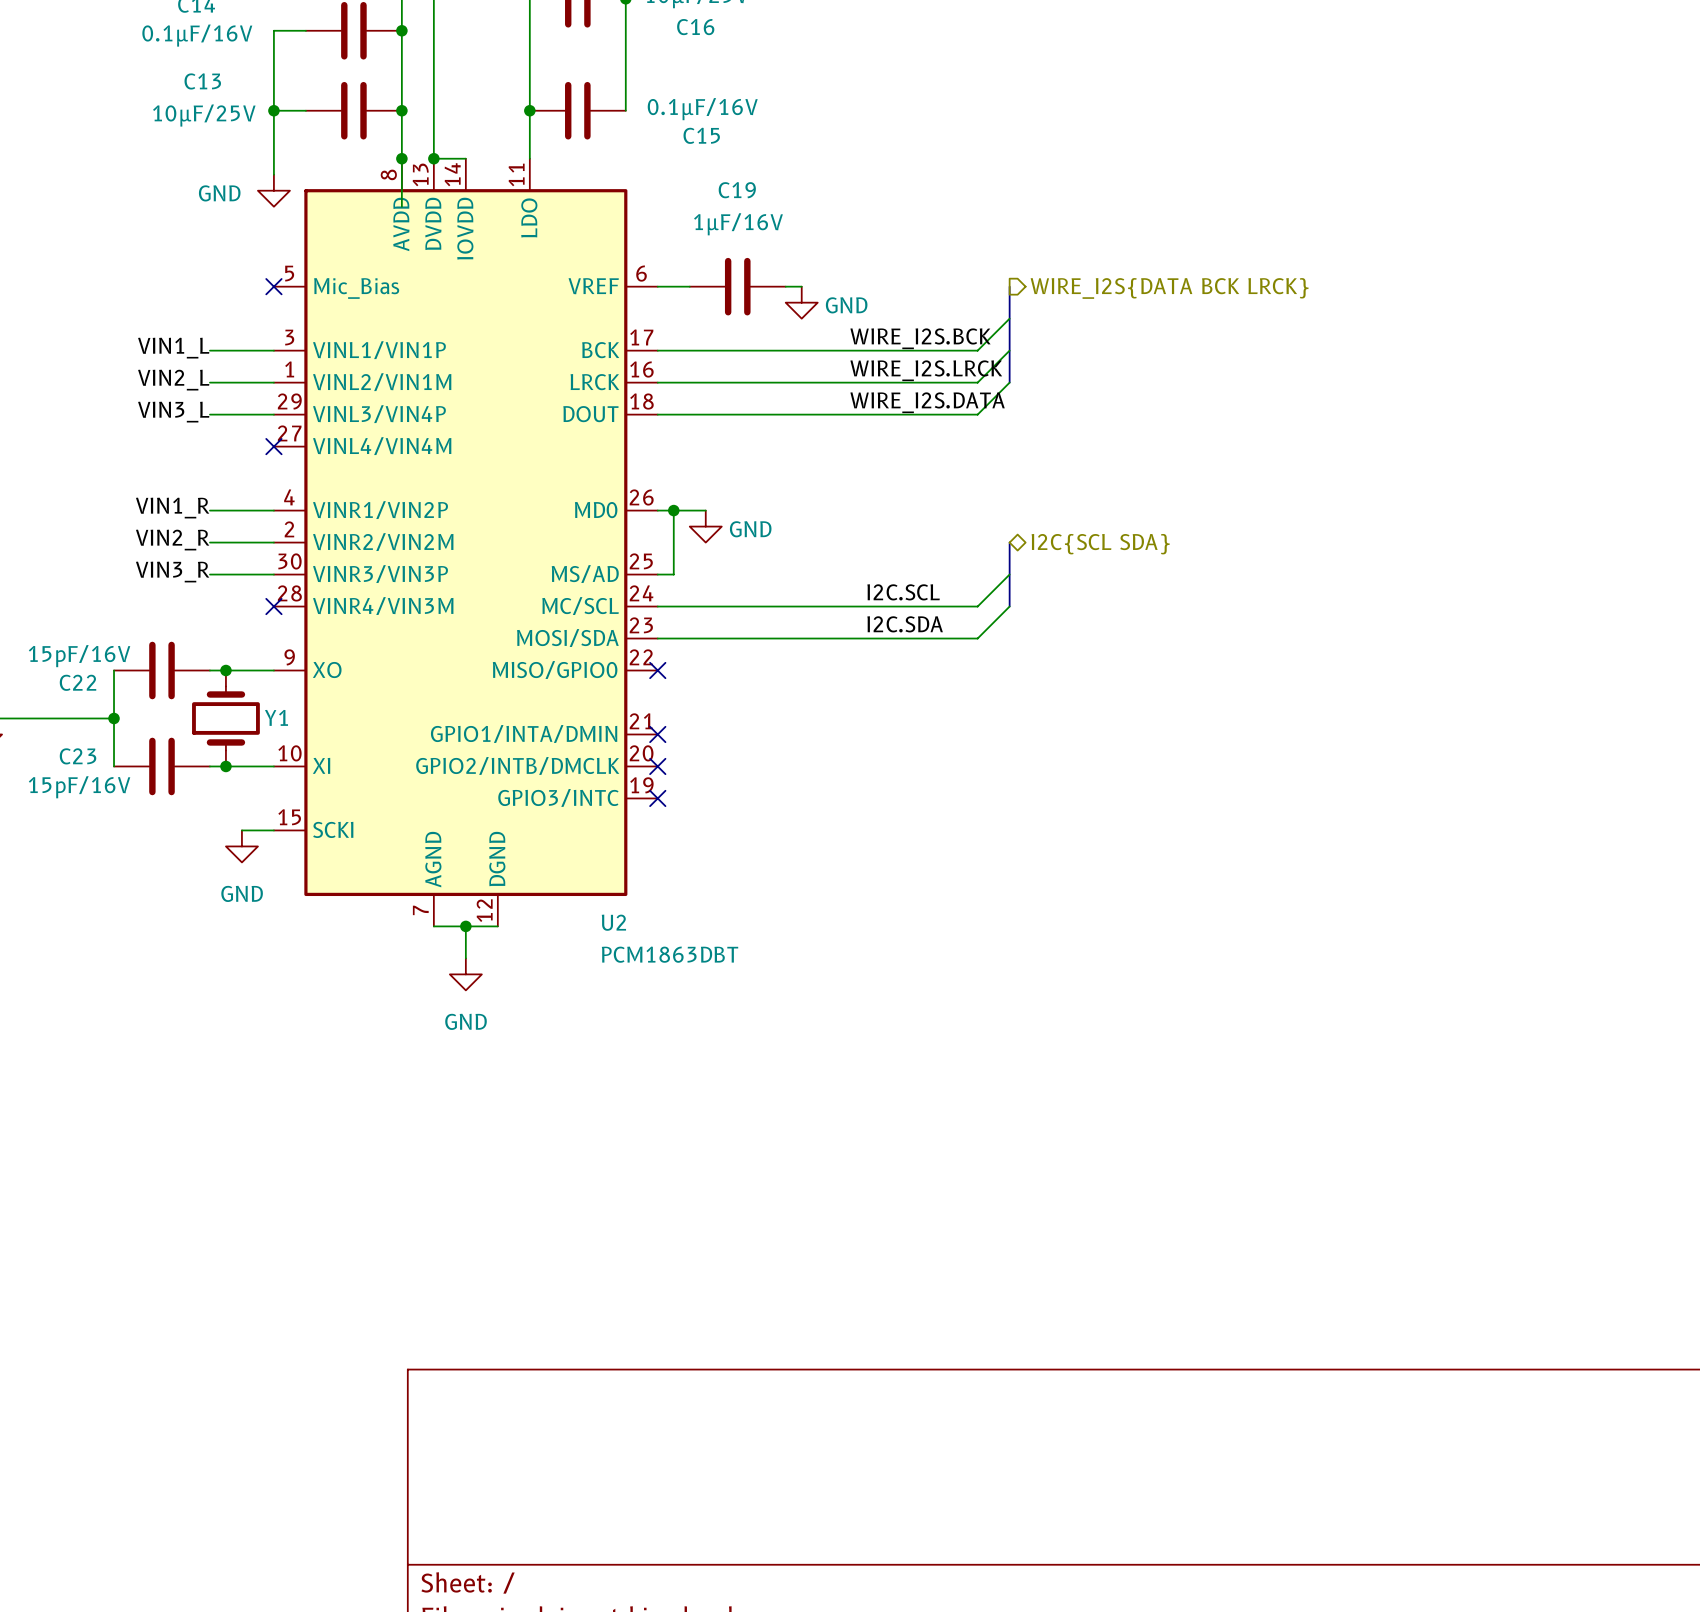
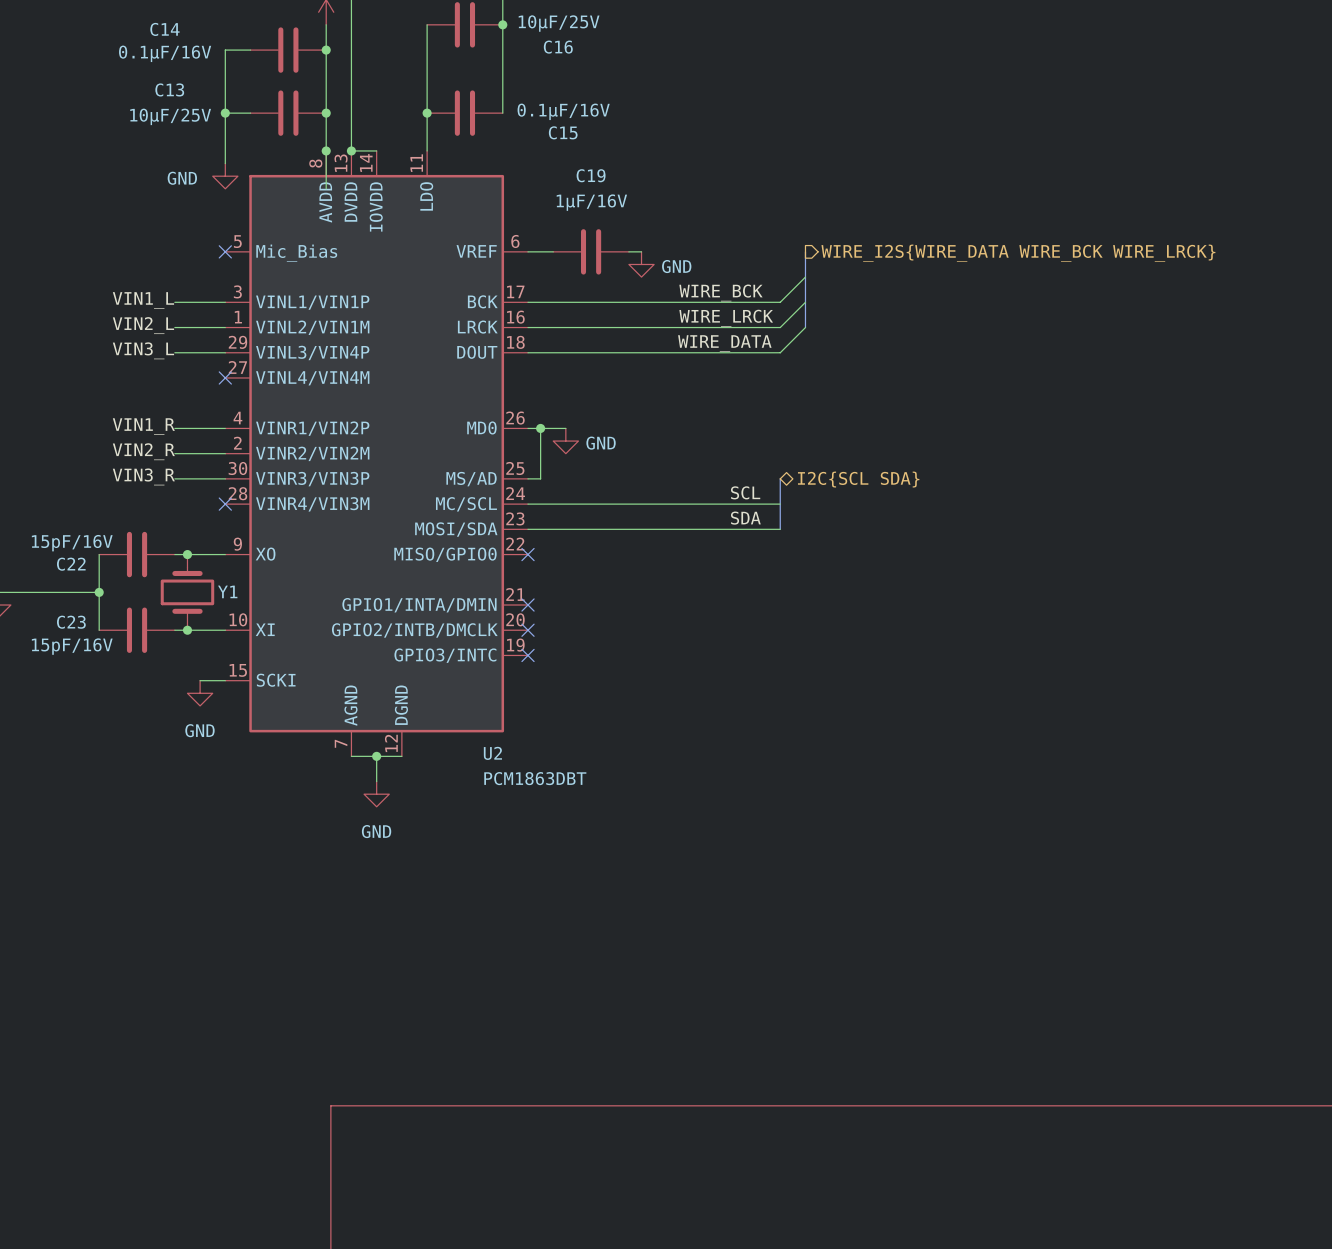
hierarchical label: WIRE_I2S{DATA BCK LRCK} (1169, 288) -> WIRE_I2S{WIRE_DATA WIRE_BCK WIRE_LRCK} (1018, 253)
label: WIRE_I2S.BCK (920, 338) -> WIRE_BCK (720, 292)
label: WIRE_I2S.LRCK (926, 370) -> WIRE_LRCK (726, 318)
label: WIRE_I2S.DATA (927, 402) -> WIRE_DATA (724, 343)
bus: (1009, 542) (1009, 606) -> (780, 478) (780, 529)
hierarchical label position: I2C{SCL SDA} (1100, 544) -> I2C{SCL SDA} (858, 479)
wire: (1009, 574) (977, 606) -> none
label: I2C.SCL (903, 592) -> none
label: none -> SCL (745, 492)
wire: (1009, 606) (977, 638) -> none
label: I2C.SDA (905, 624) -> none
label: none -> SDA (745, 518)

